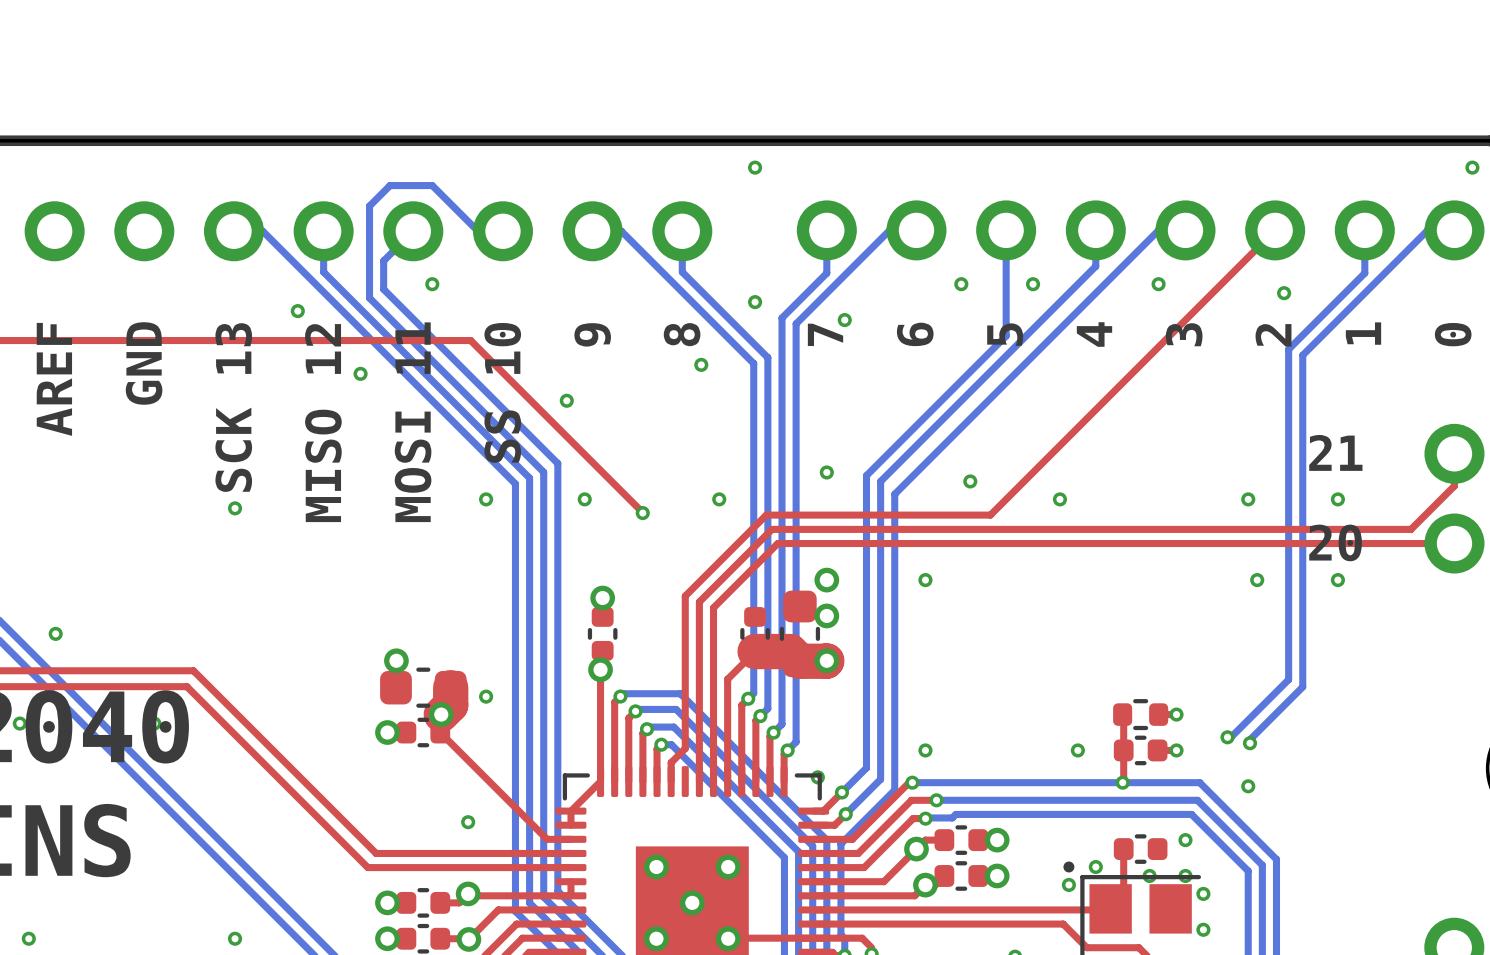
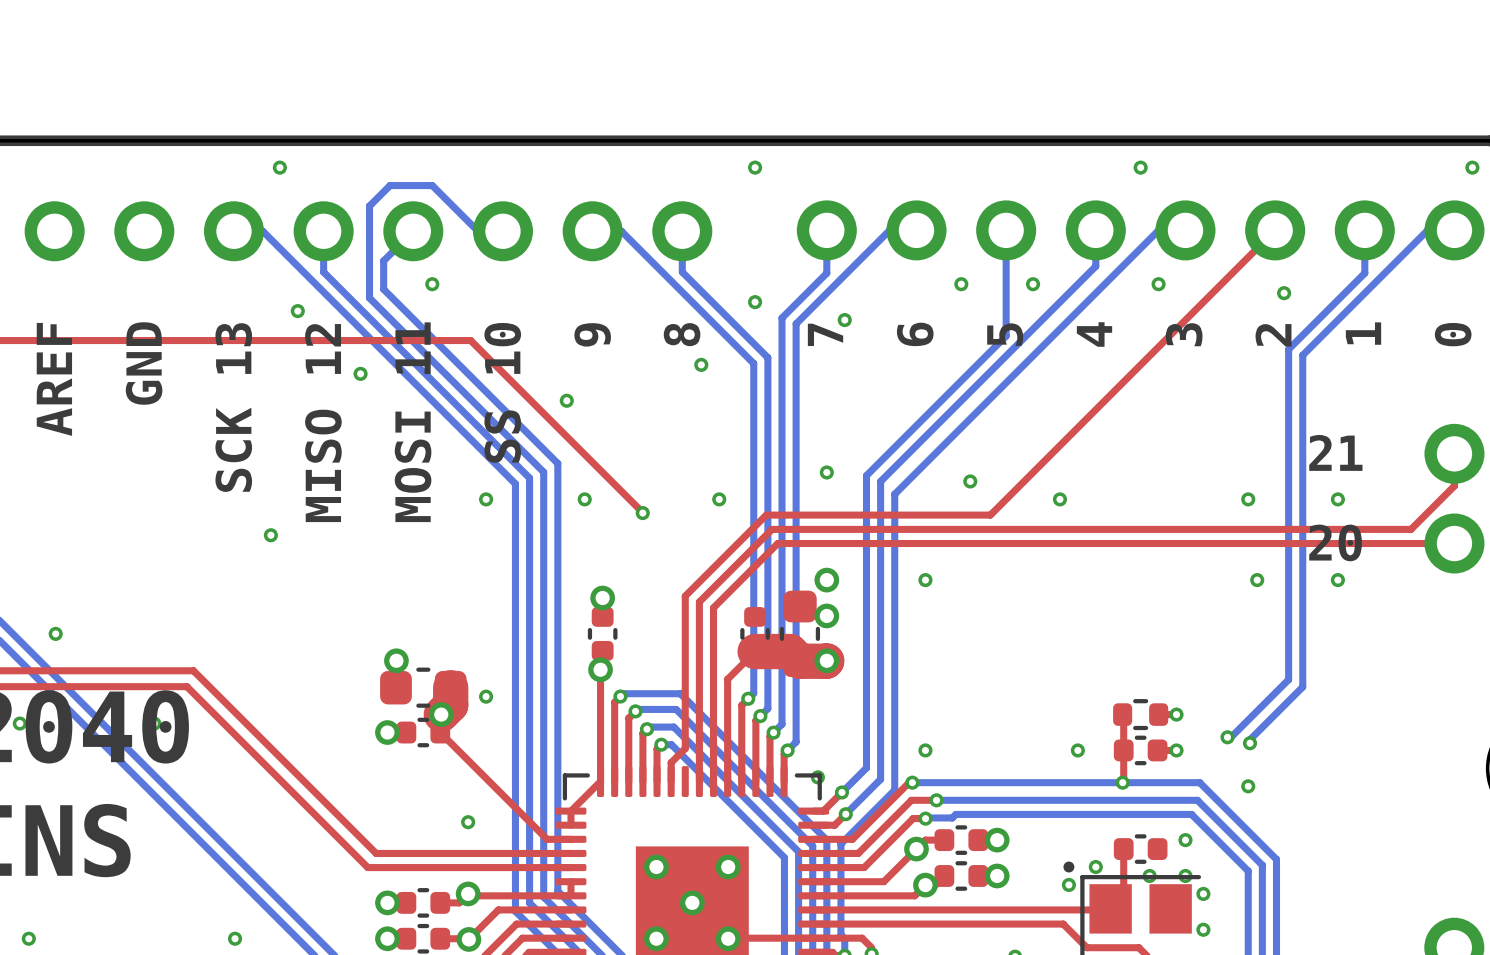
via: none -> (279, 167)
via: none -> (1140, 167)
via position: (235, 508) -> (270, 535)

